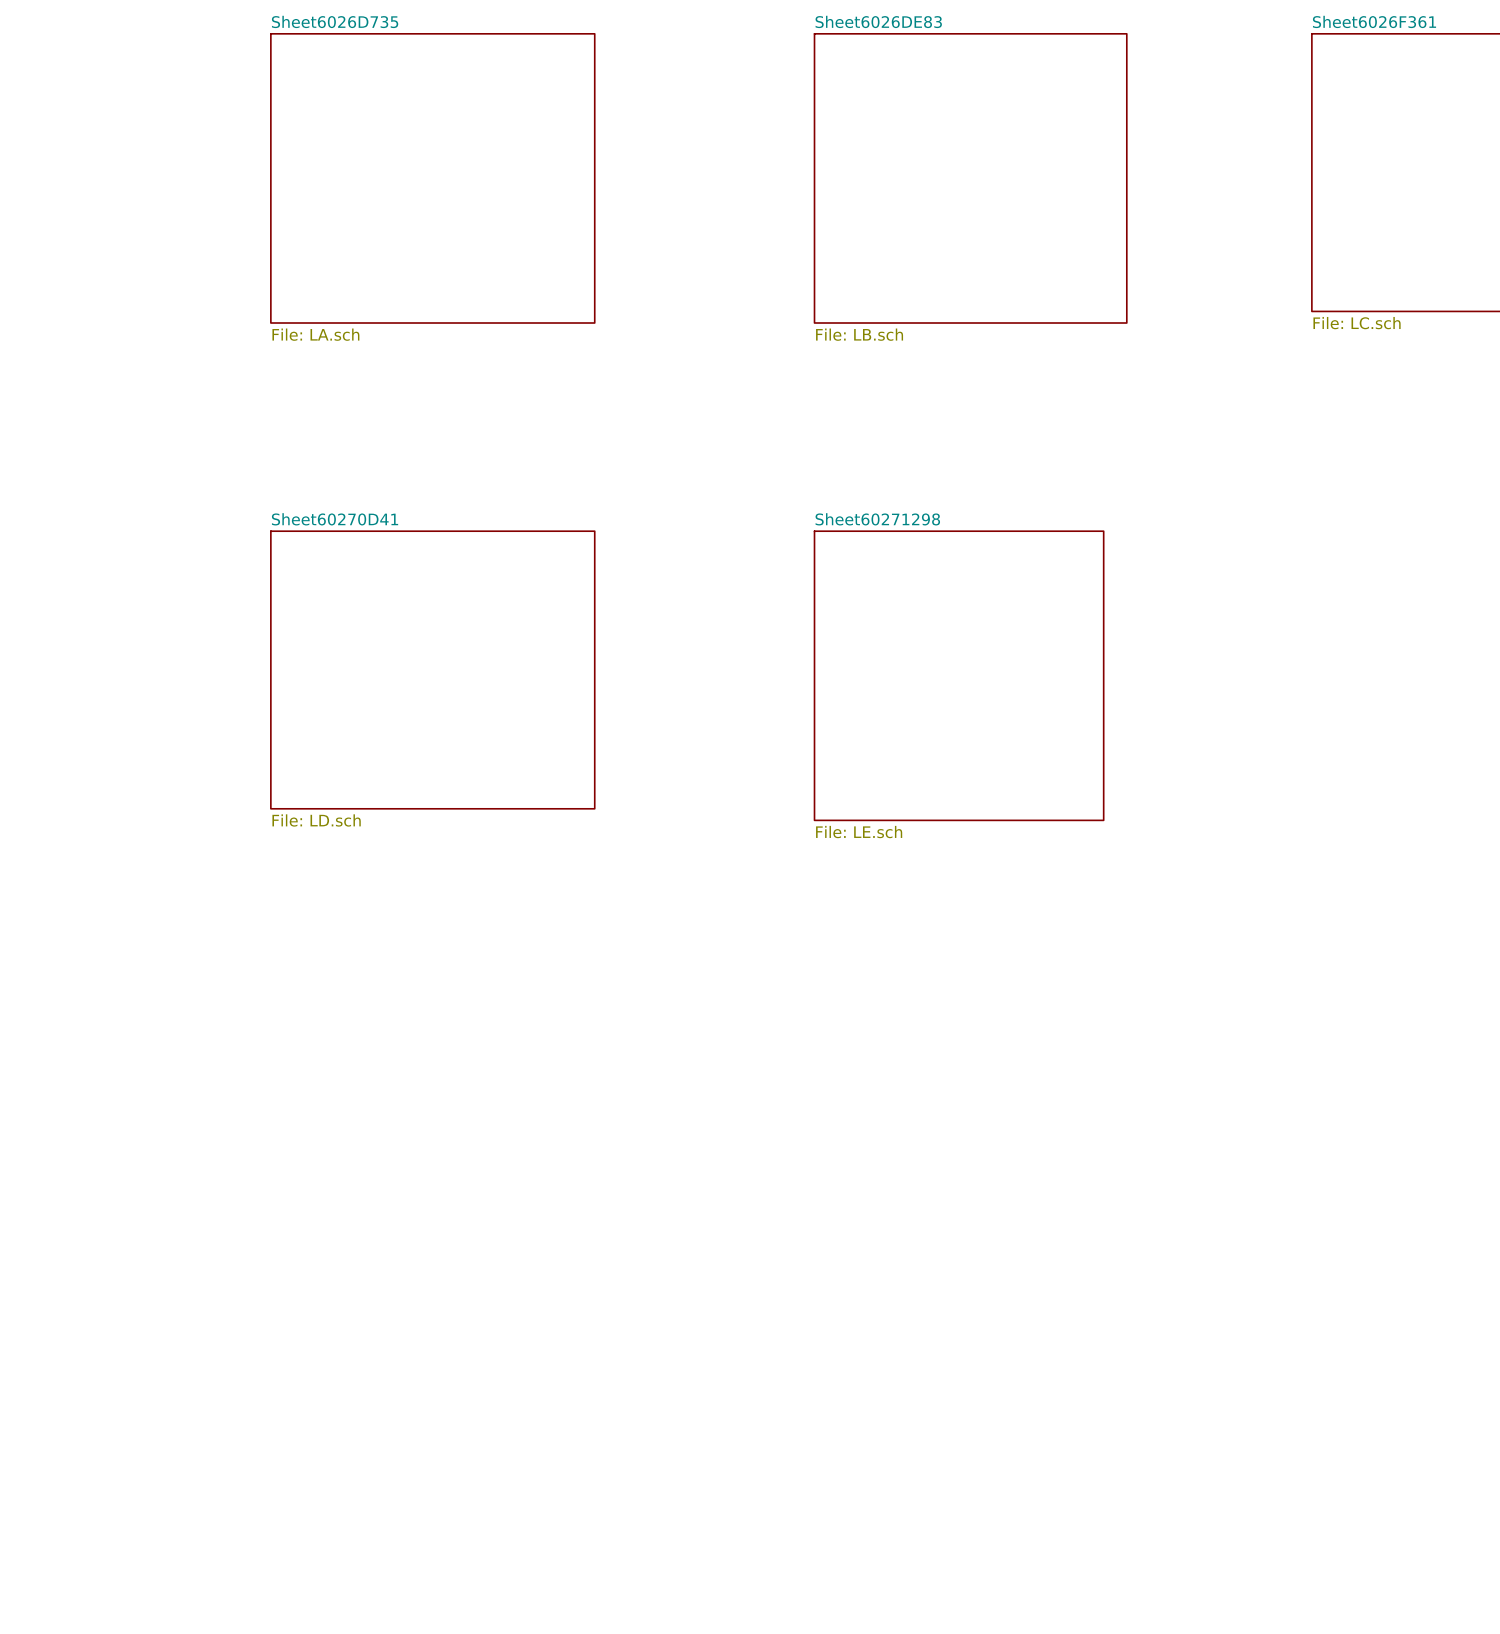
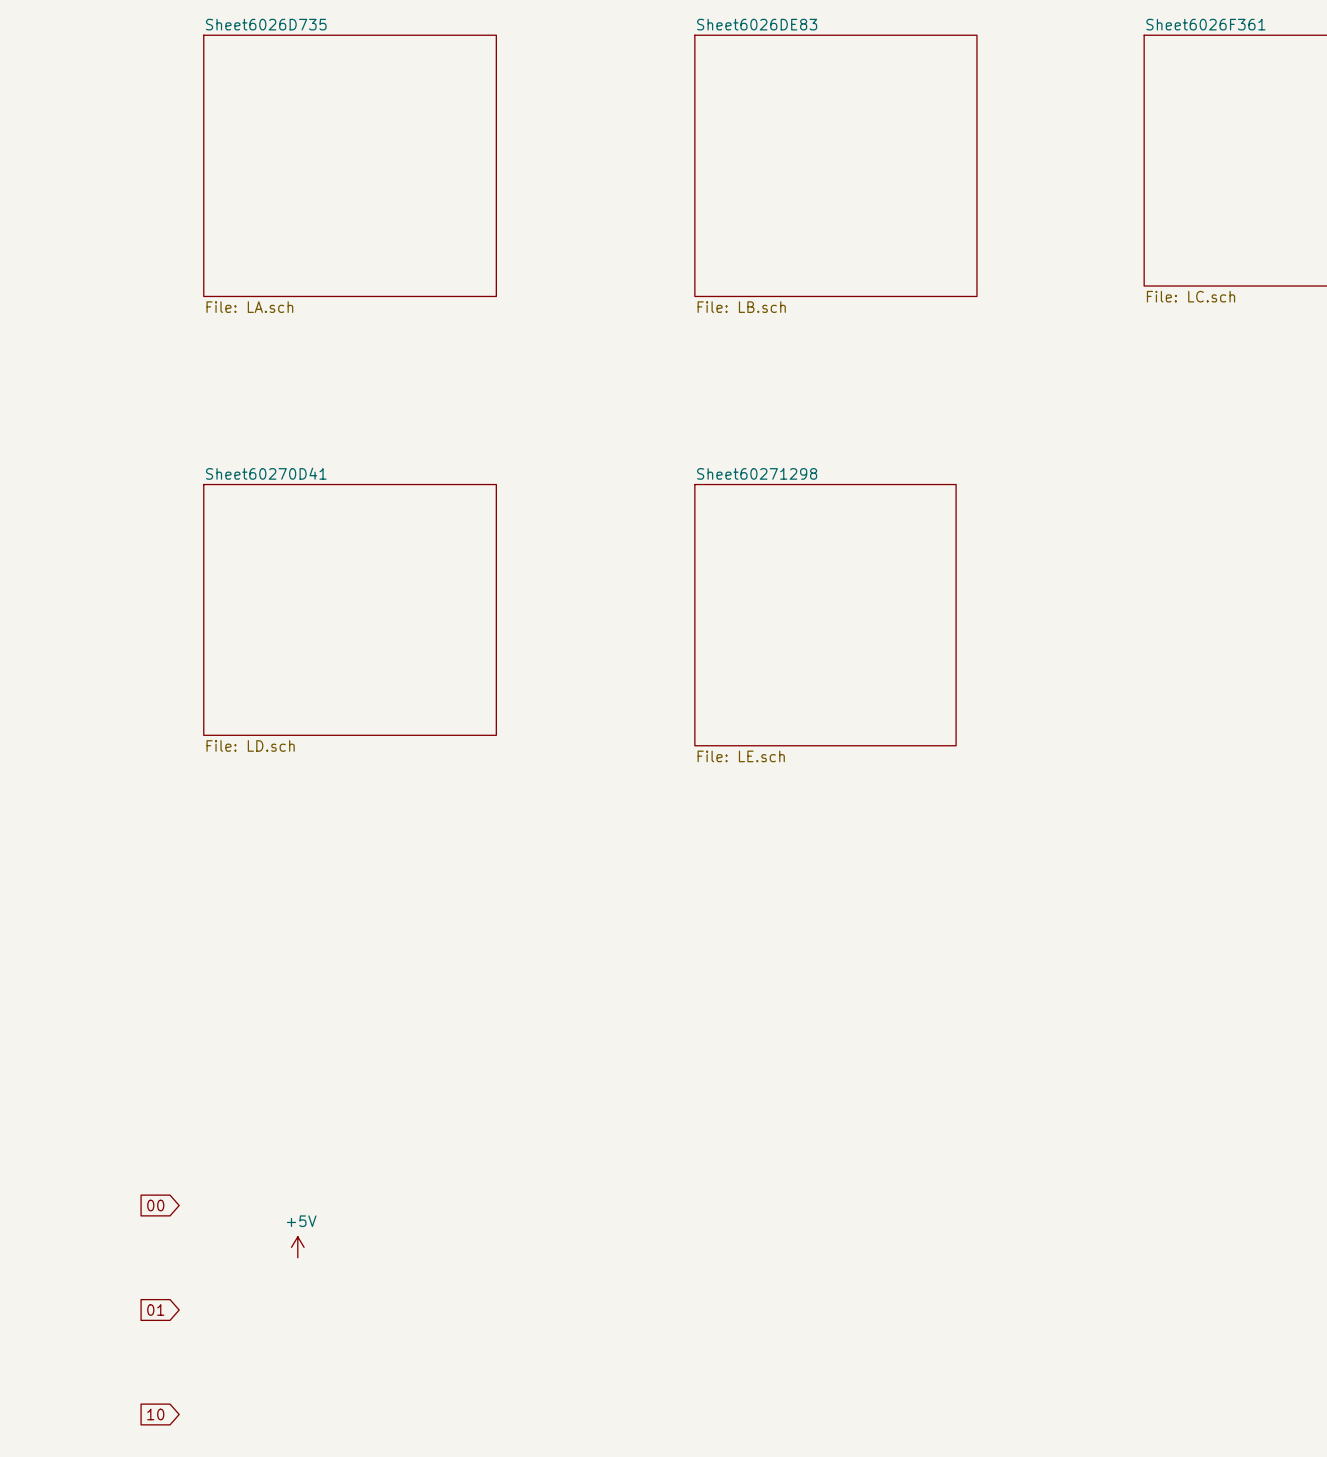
global label: none -> 00 (155, 1205)
power symbol: none -> +5V (297, 1247)
global label: none -> 01 (155, 1309)
global label: none -> 10 (155, 1414)

